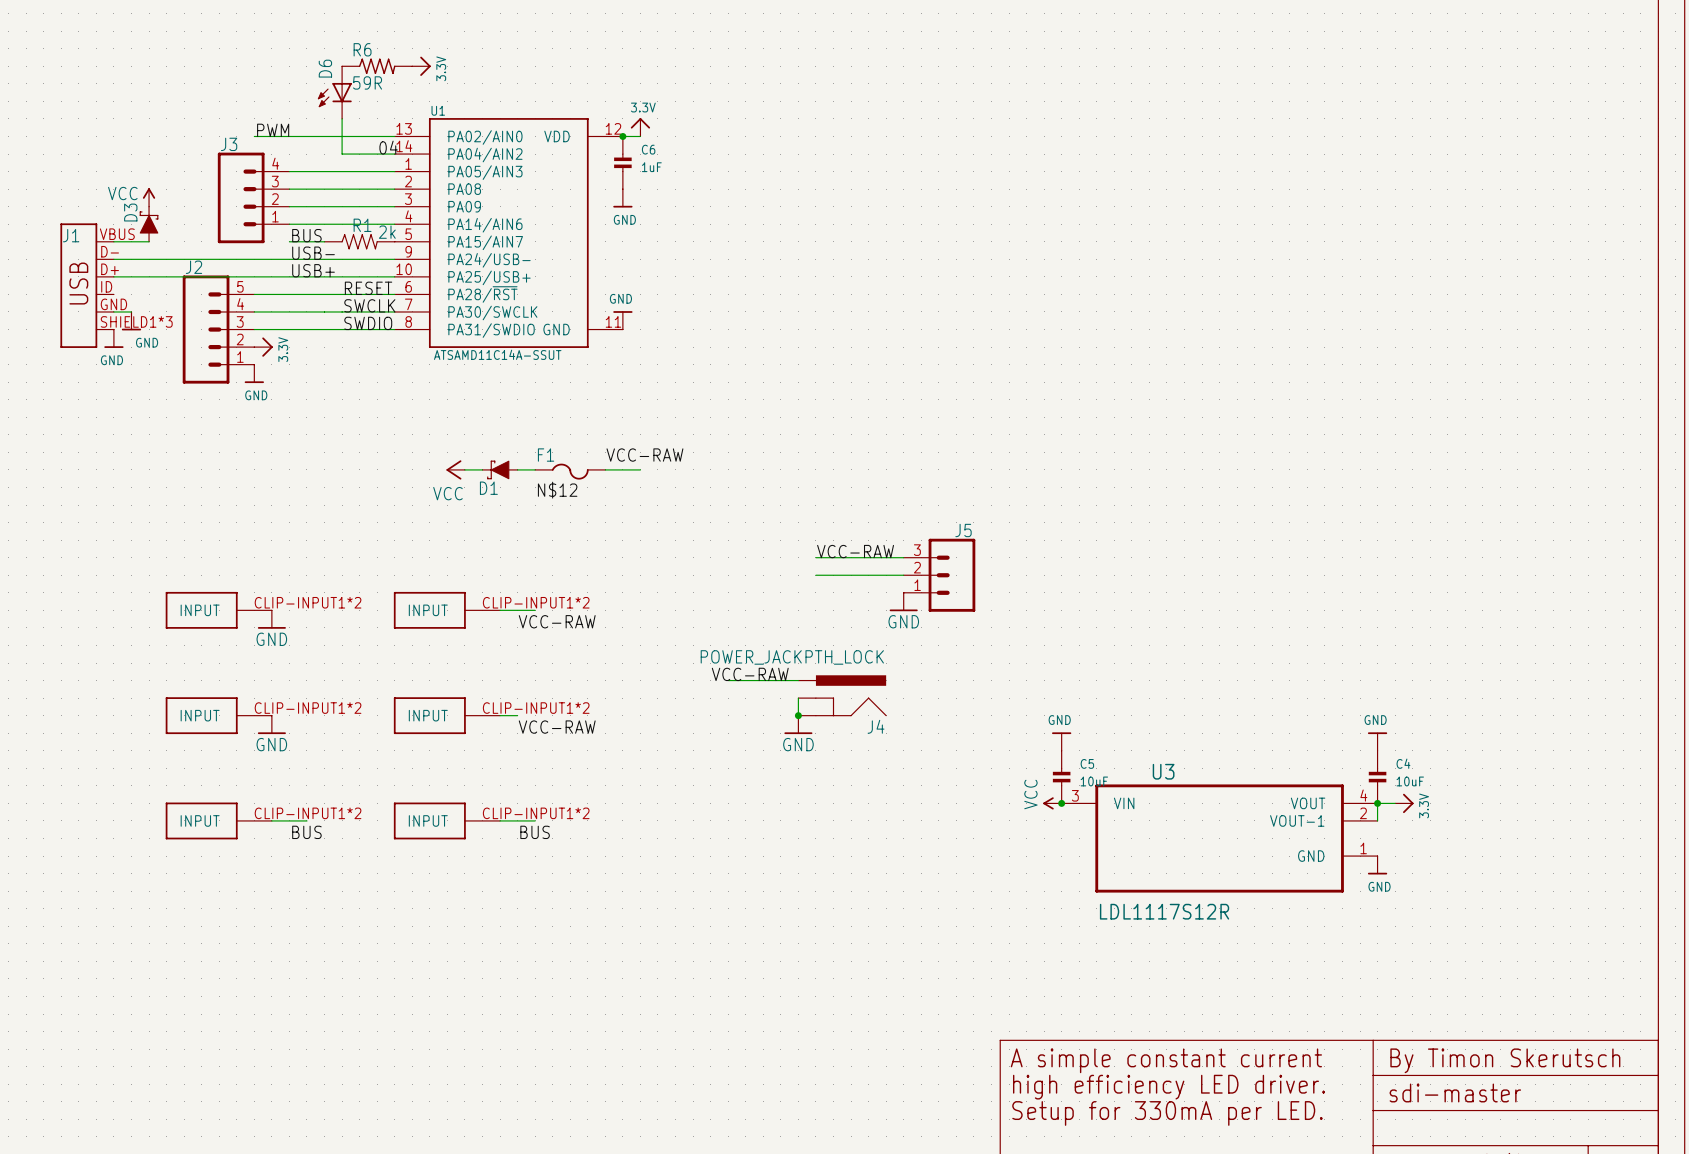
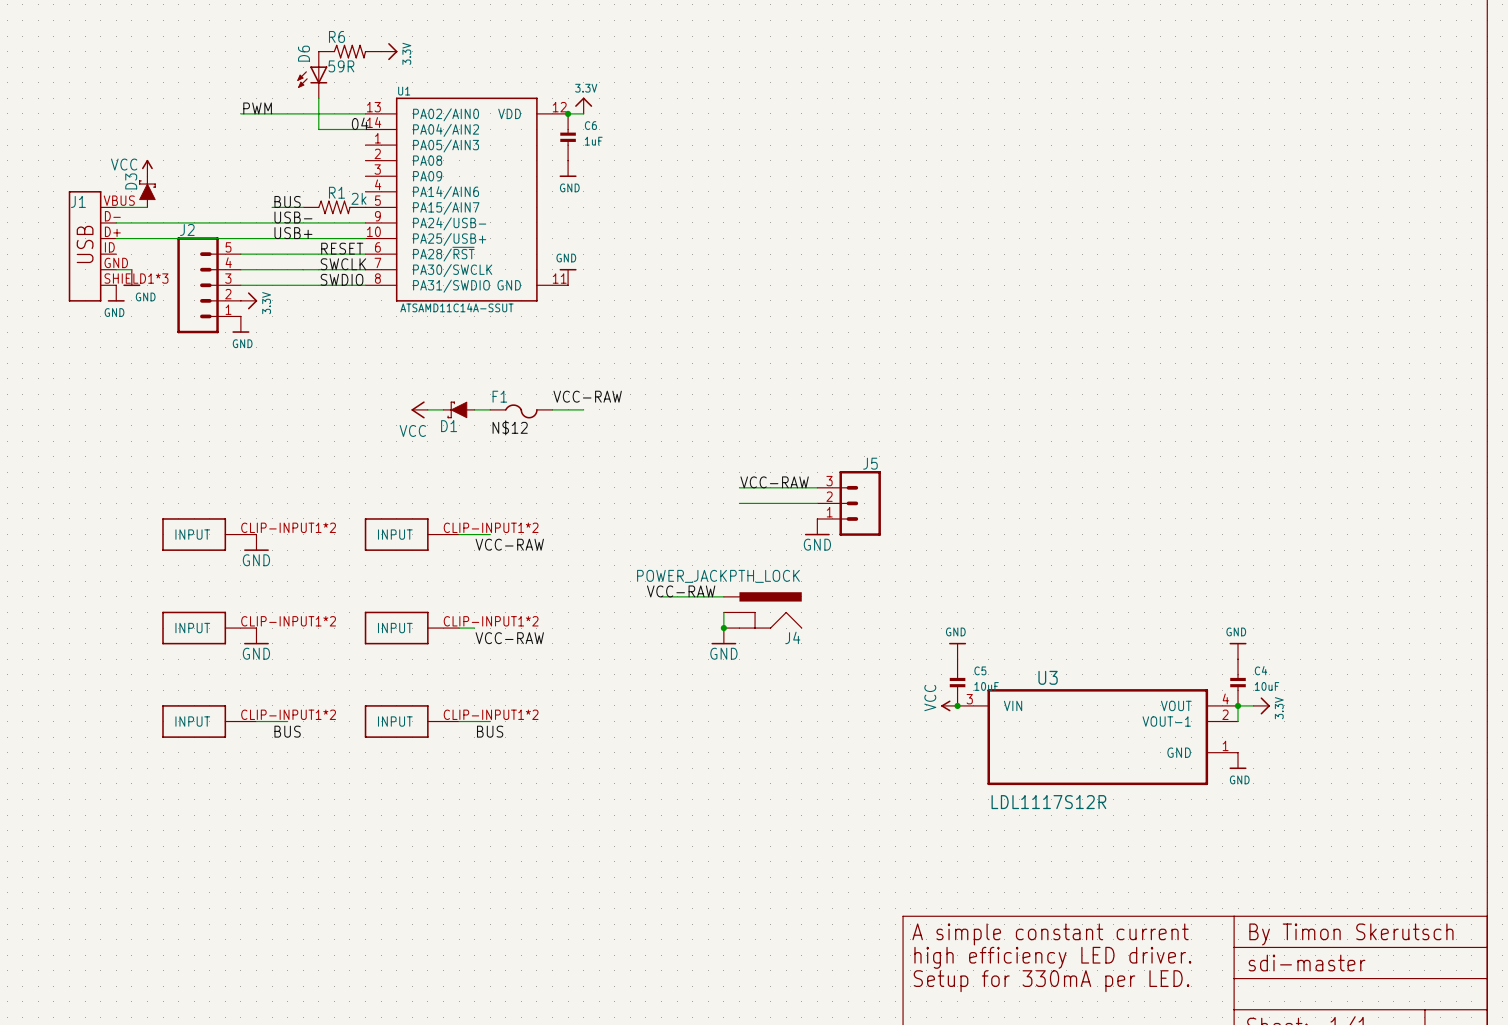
wire: (289, 171) (394, 171) -> none
wire: (289, 189) (394, 189) -> none
J3: (253, 197) -> none
wire: (289, 206) (394, 206) -> none
wire: (289, 224) (394, 224) -> none

